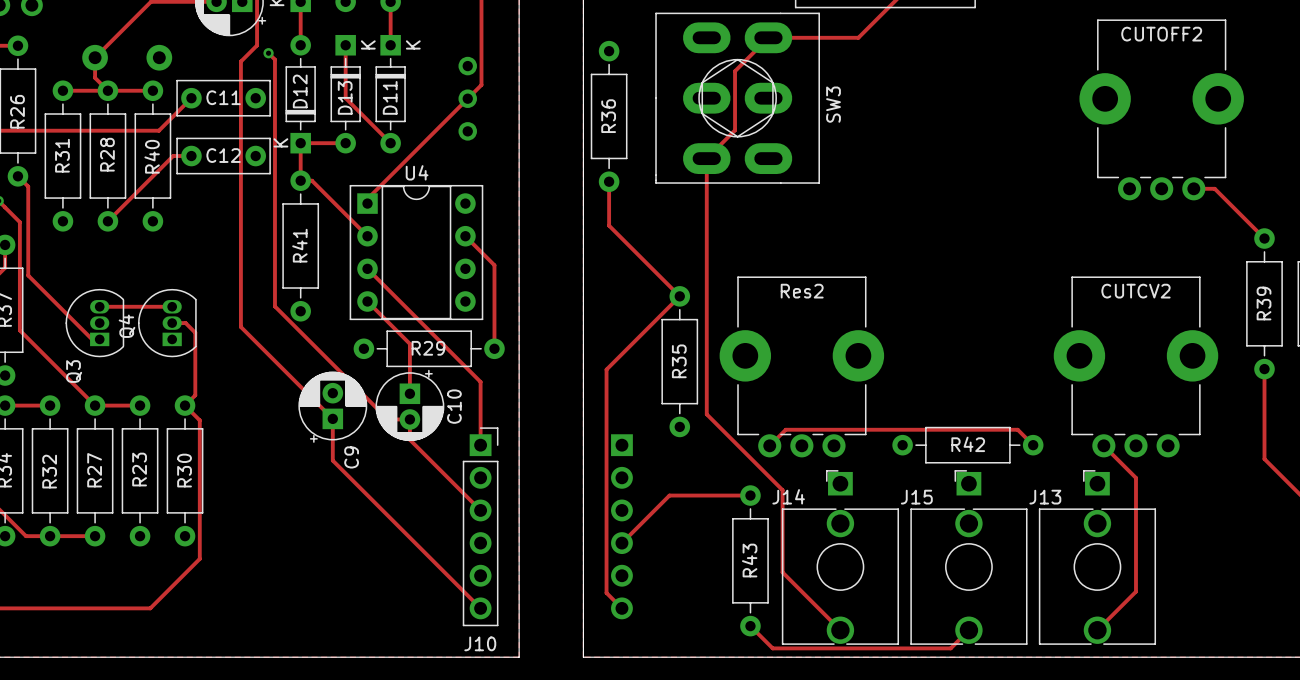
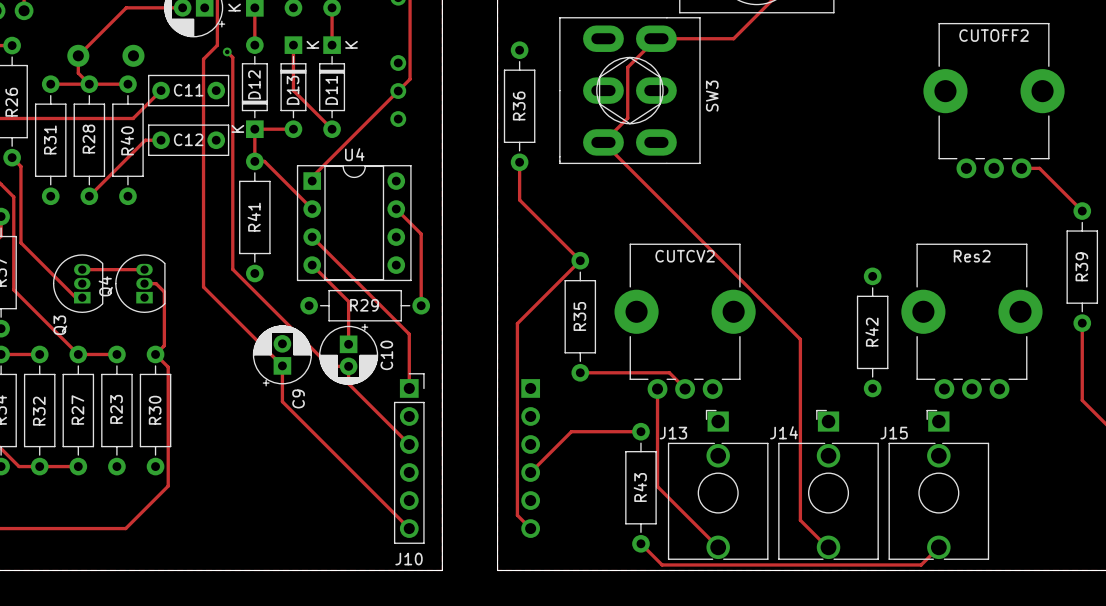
track: (706, 158) (706, 414) (782, 490) (782, 572) -> (603, 142) (800, 339) (800, 520) (827, 547)
Res2 name: Res2 (802, 291) -> CUTCV2 (685, 256)
CUTCV2 name: CUTCV2 (1135, 291) -> Res2 (972, 256)
track: none -> (580, 372) (669, 372) (685, 388)
track: none -> (657, 388) (657, 486) (668, 497)
R42 rotation: 0° (967, 445) -> 90° clockwise (872, 332)
track: (1033, 445) (1017, 429) (785, 429) (769, 445) -> none
track: (1103, 445) (1135, 477) (1135, 591) (1097, 630) -> none
J14 name: J14 (788, 496) -> J13 (673, 433)
J15 name: J15 (916, 497) -> J14 (784, 432)
J13 name: J13 (1045, 497) -> J15 (894, 433)
track: (968, 630) (950, 648) (772, 648) -> (938, 547) (921, 564) (662, 564) (660, 562)

